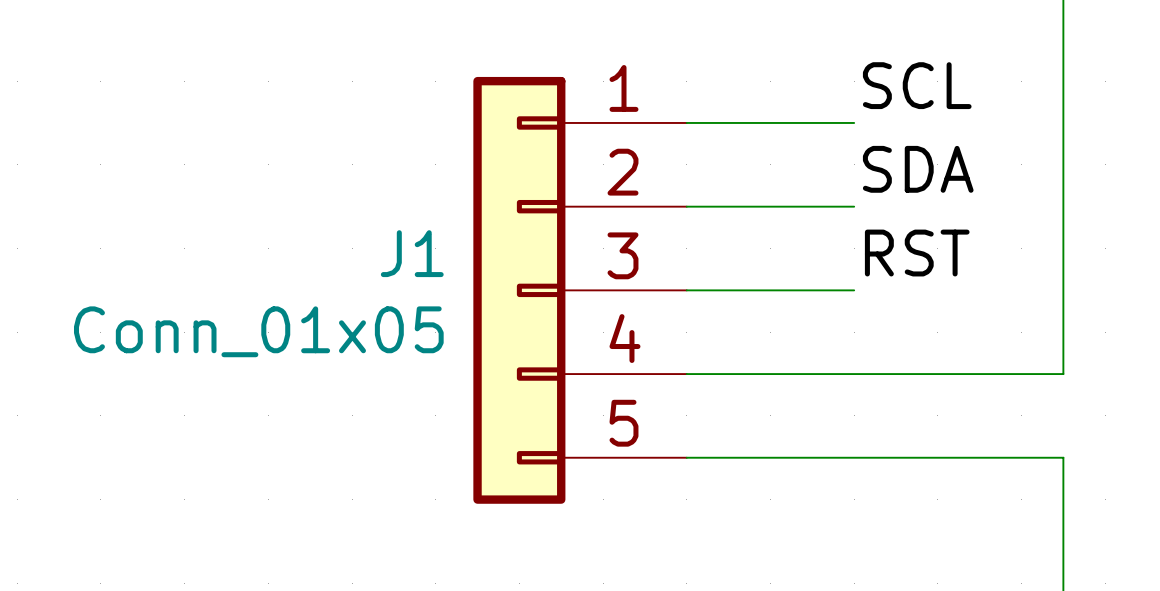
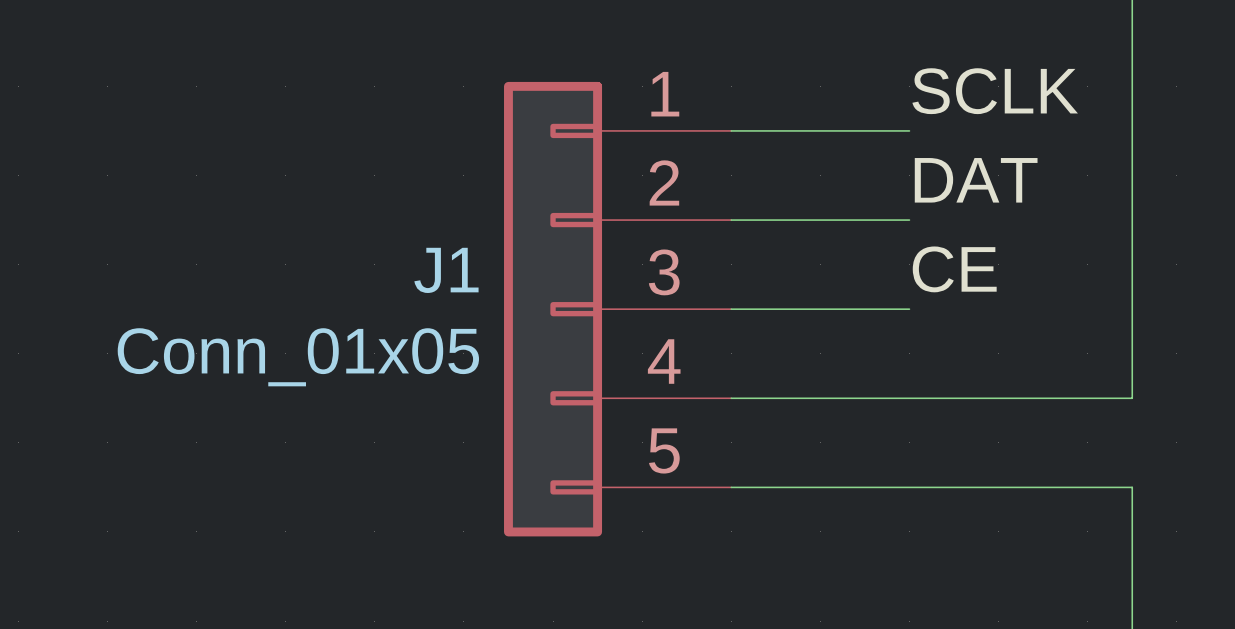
label: SCL (917, 85) -> SCLK (995, 91)
label: SDA (918, 169) -> DAT (976, 180)
label: RST (917, 253) -> CE (954, 269)

